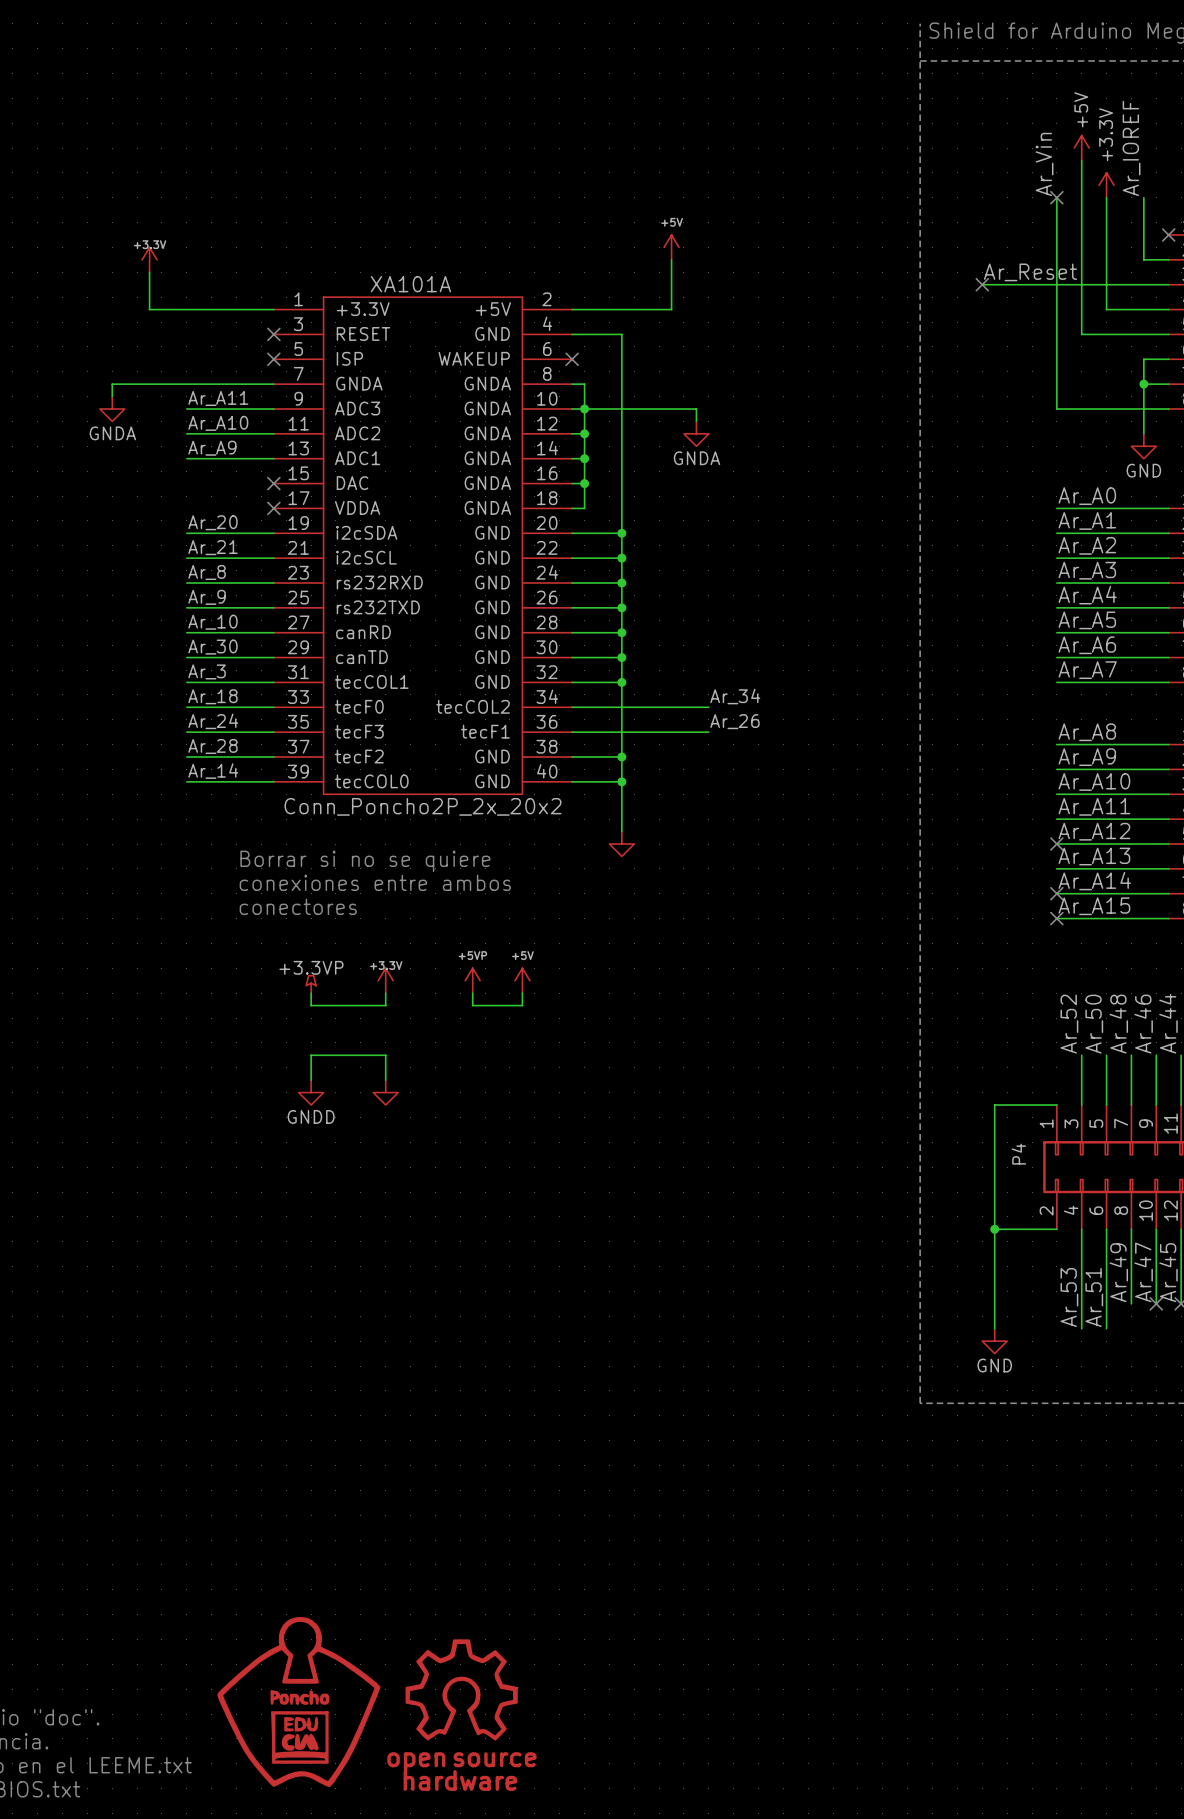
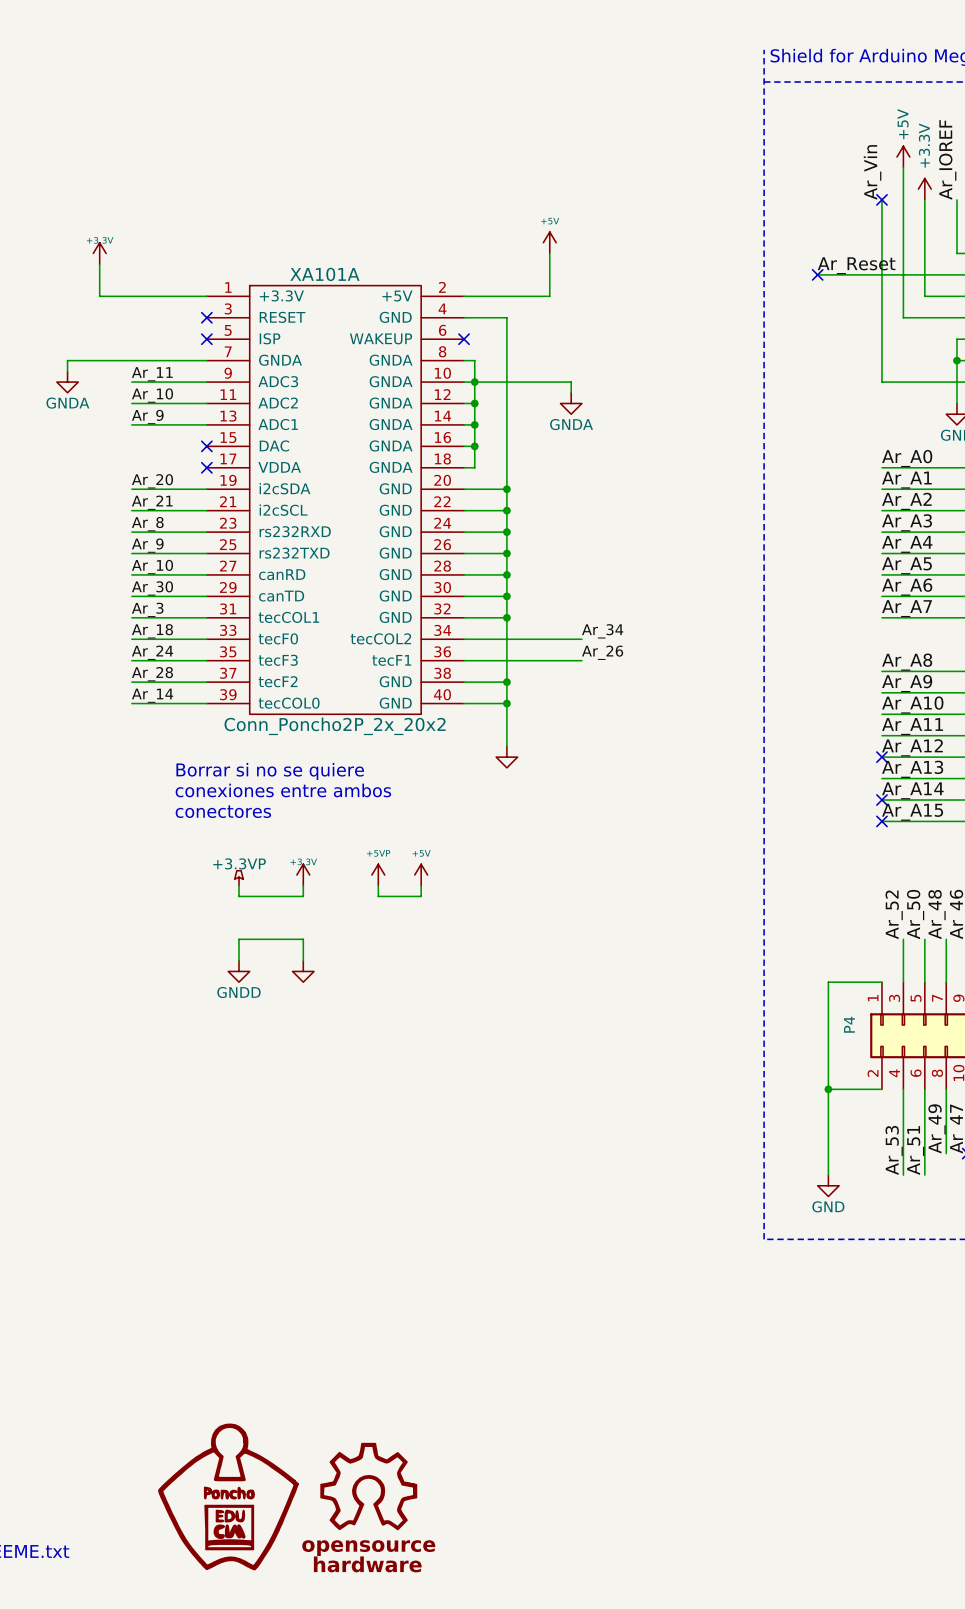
label: Ar_A11 (218, 398) -> Ar_11 (152, 374)
label: Ar_A10 (218, 423) -> Ar_10 (152, 395)
label: Ar_A9 (212, 448) -> Ar_9 (147, 417)

